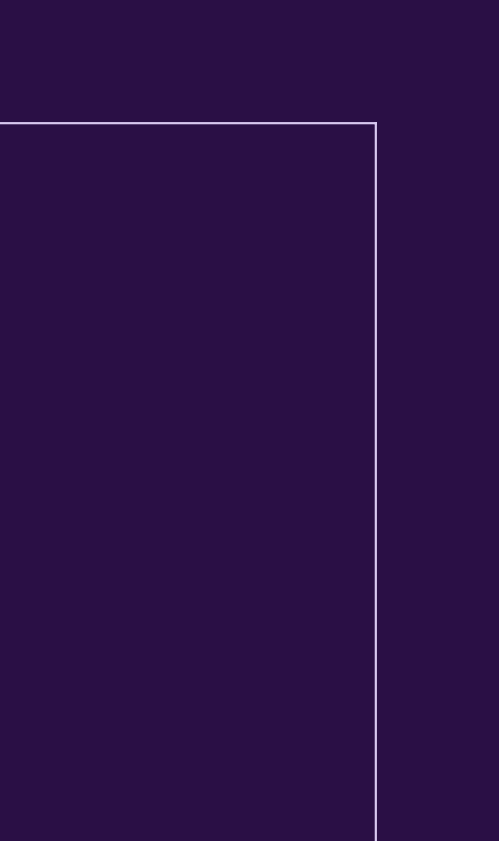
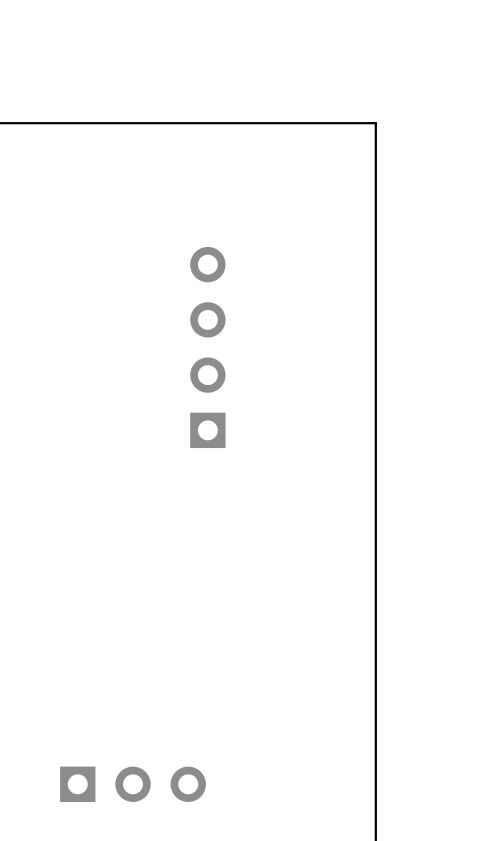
part: none -> (207, 347)
part: none -> (133, 784)

